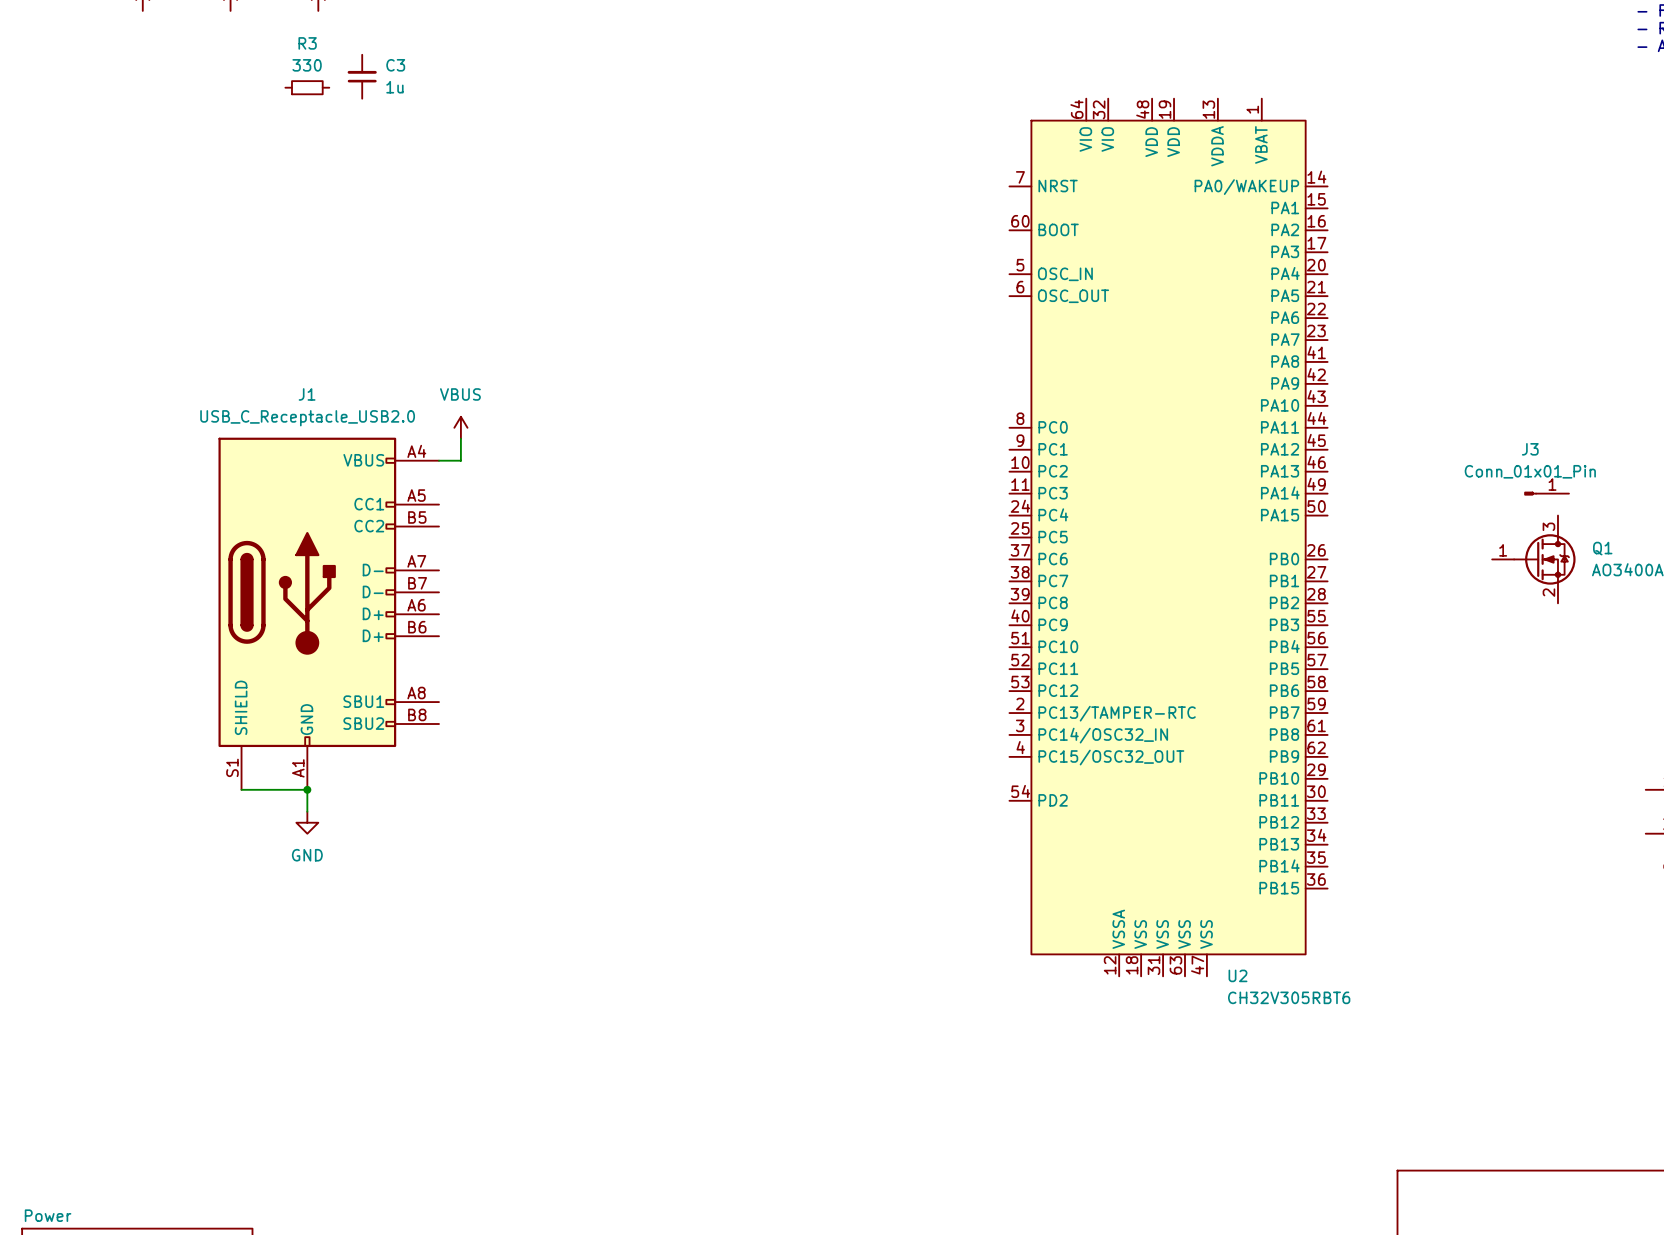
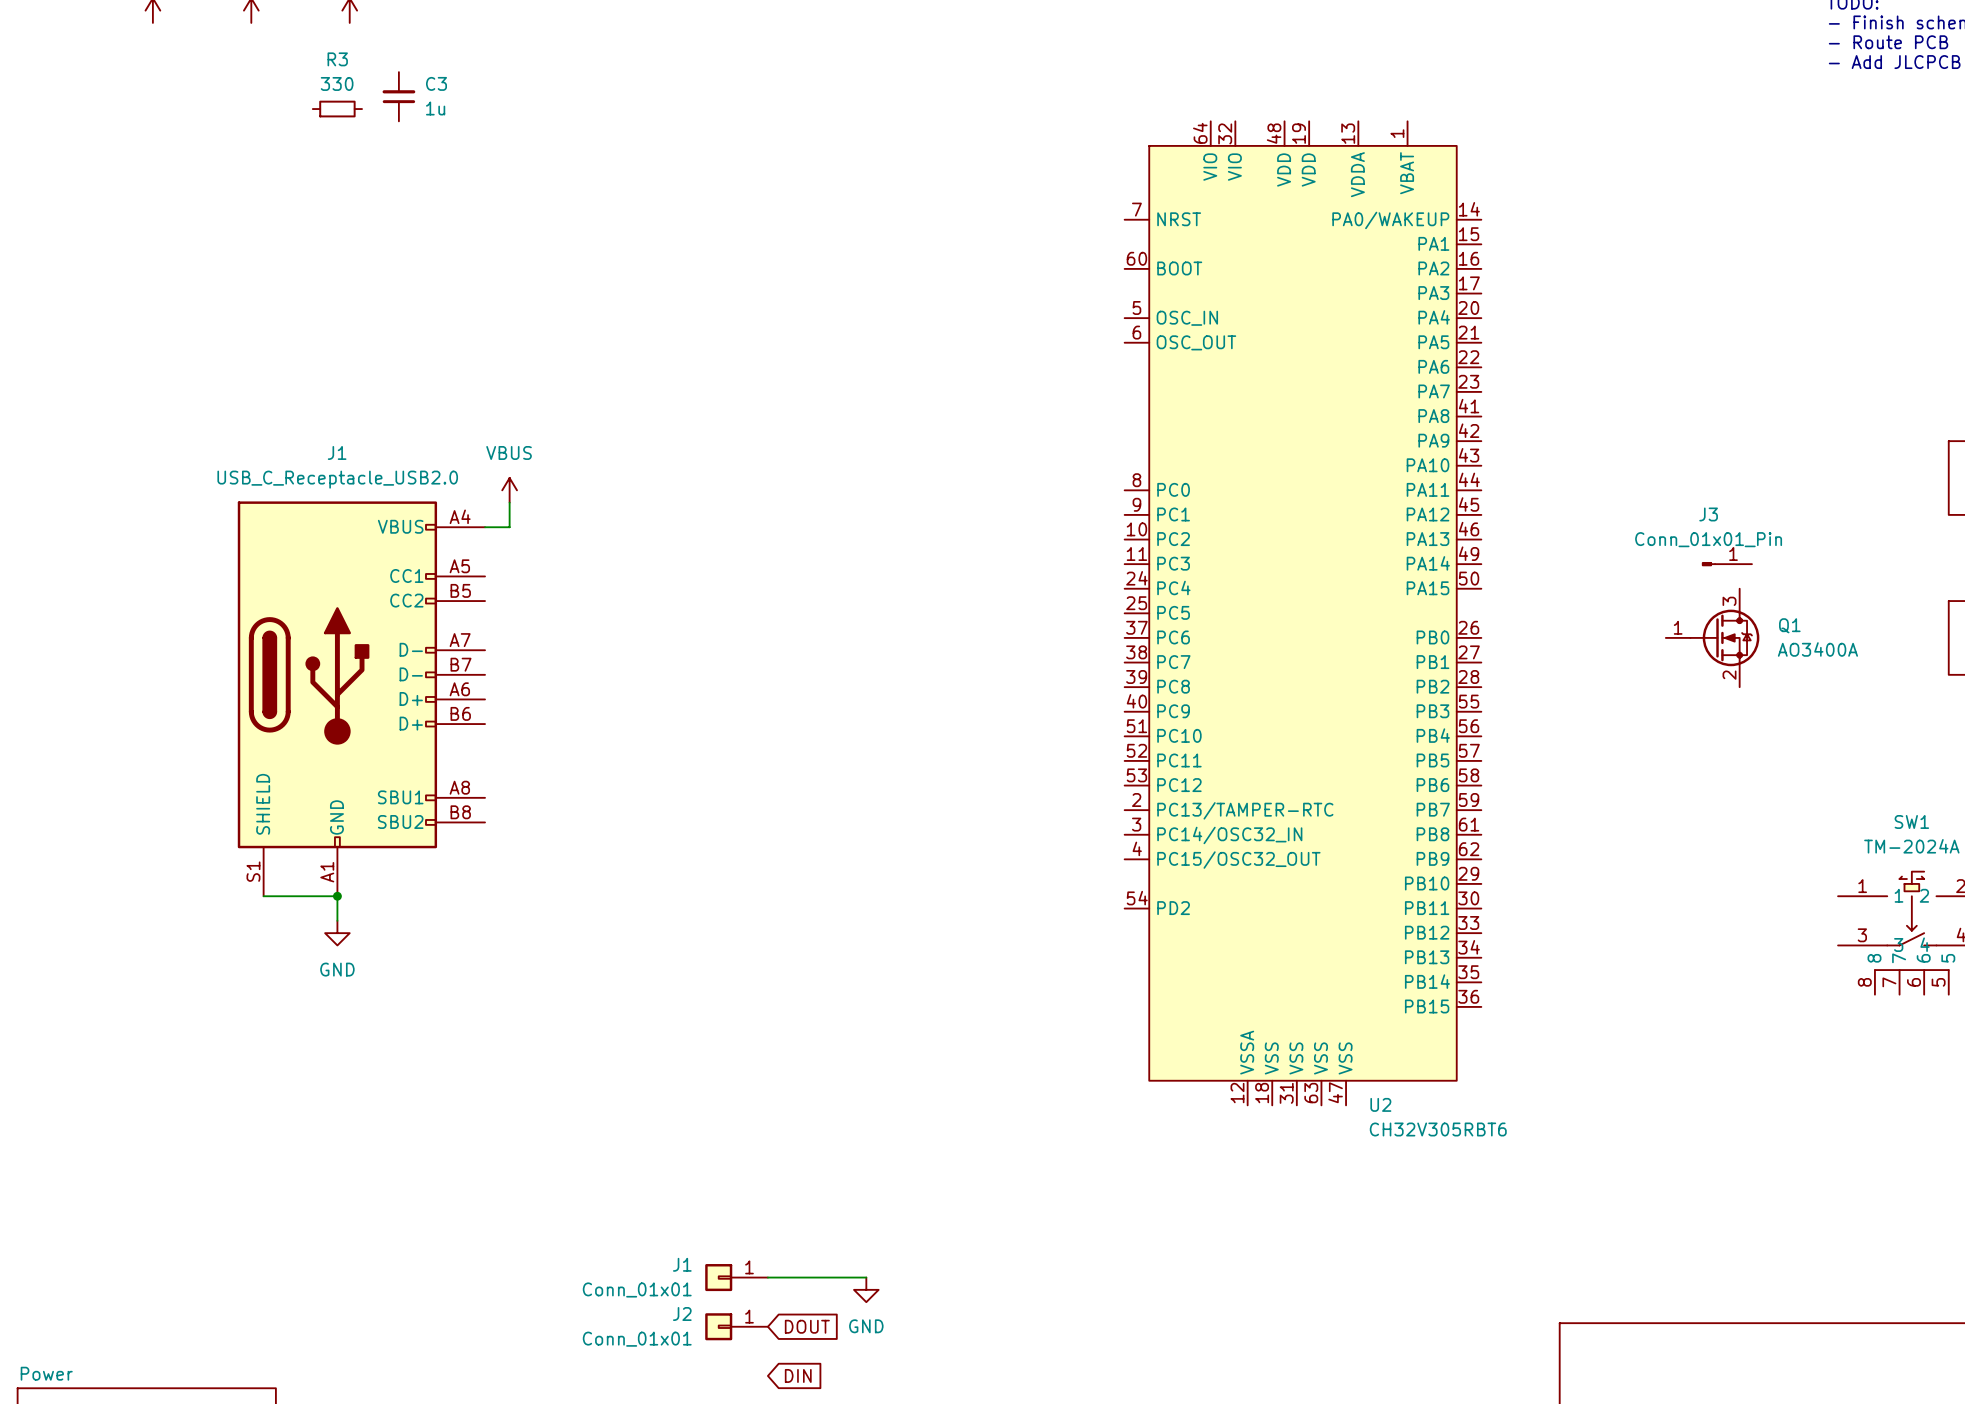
J1: none -> Conn_01x01 (736, 1277)
wire: none -> (767, 1277) (866, 1277)
power symbol: none -> GND (866, 1289)
J2: none -> Conn_01x01 (736, 1326)
global label: none -> DOUT (807, 1326)
global label: none -> DIN (798, 1375)

